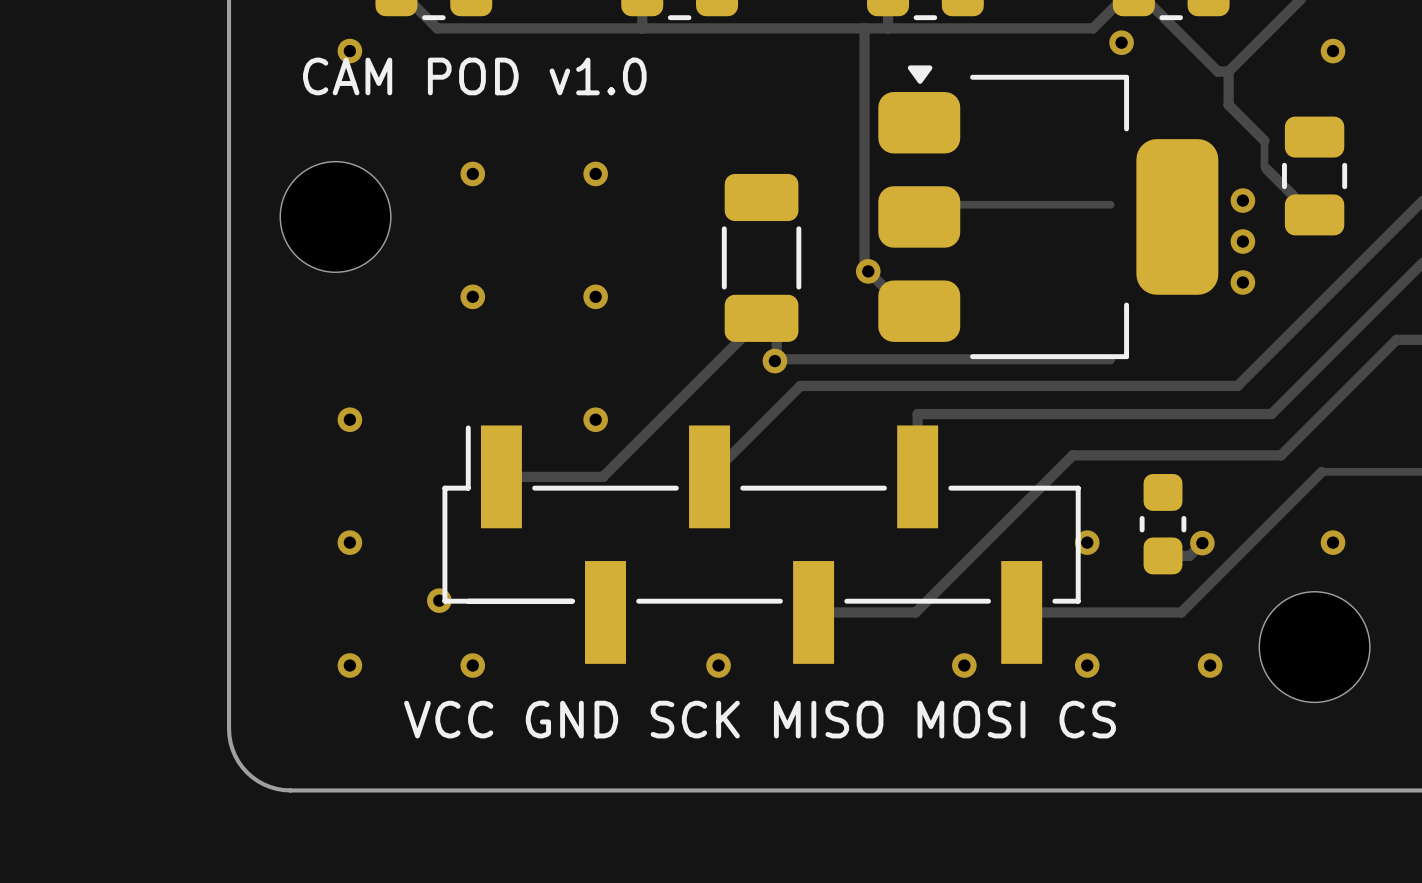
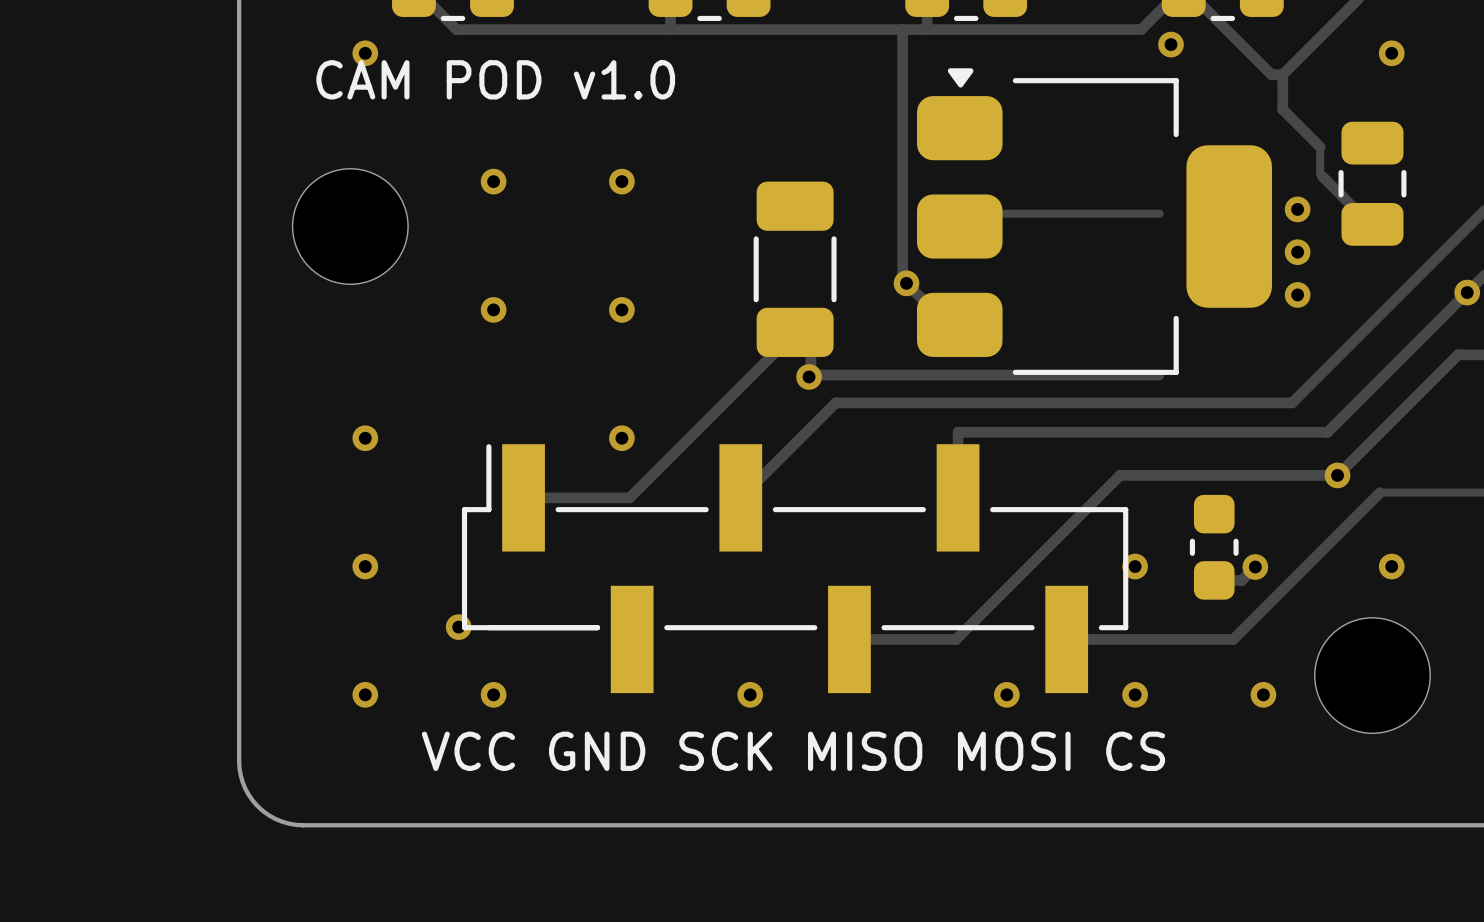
via: none -> (1467, 292)
via: none -> (1337, 475)

